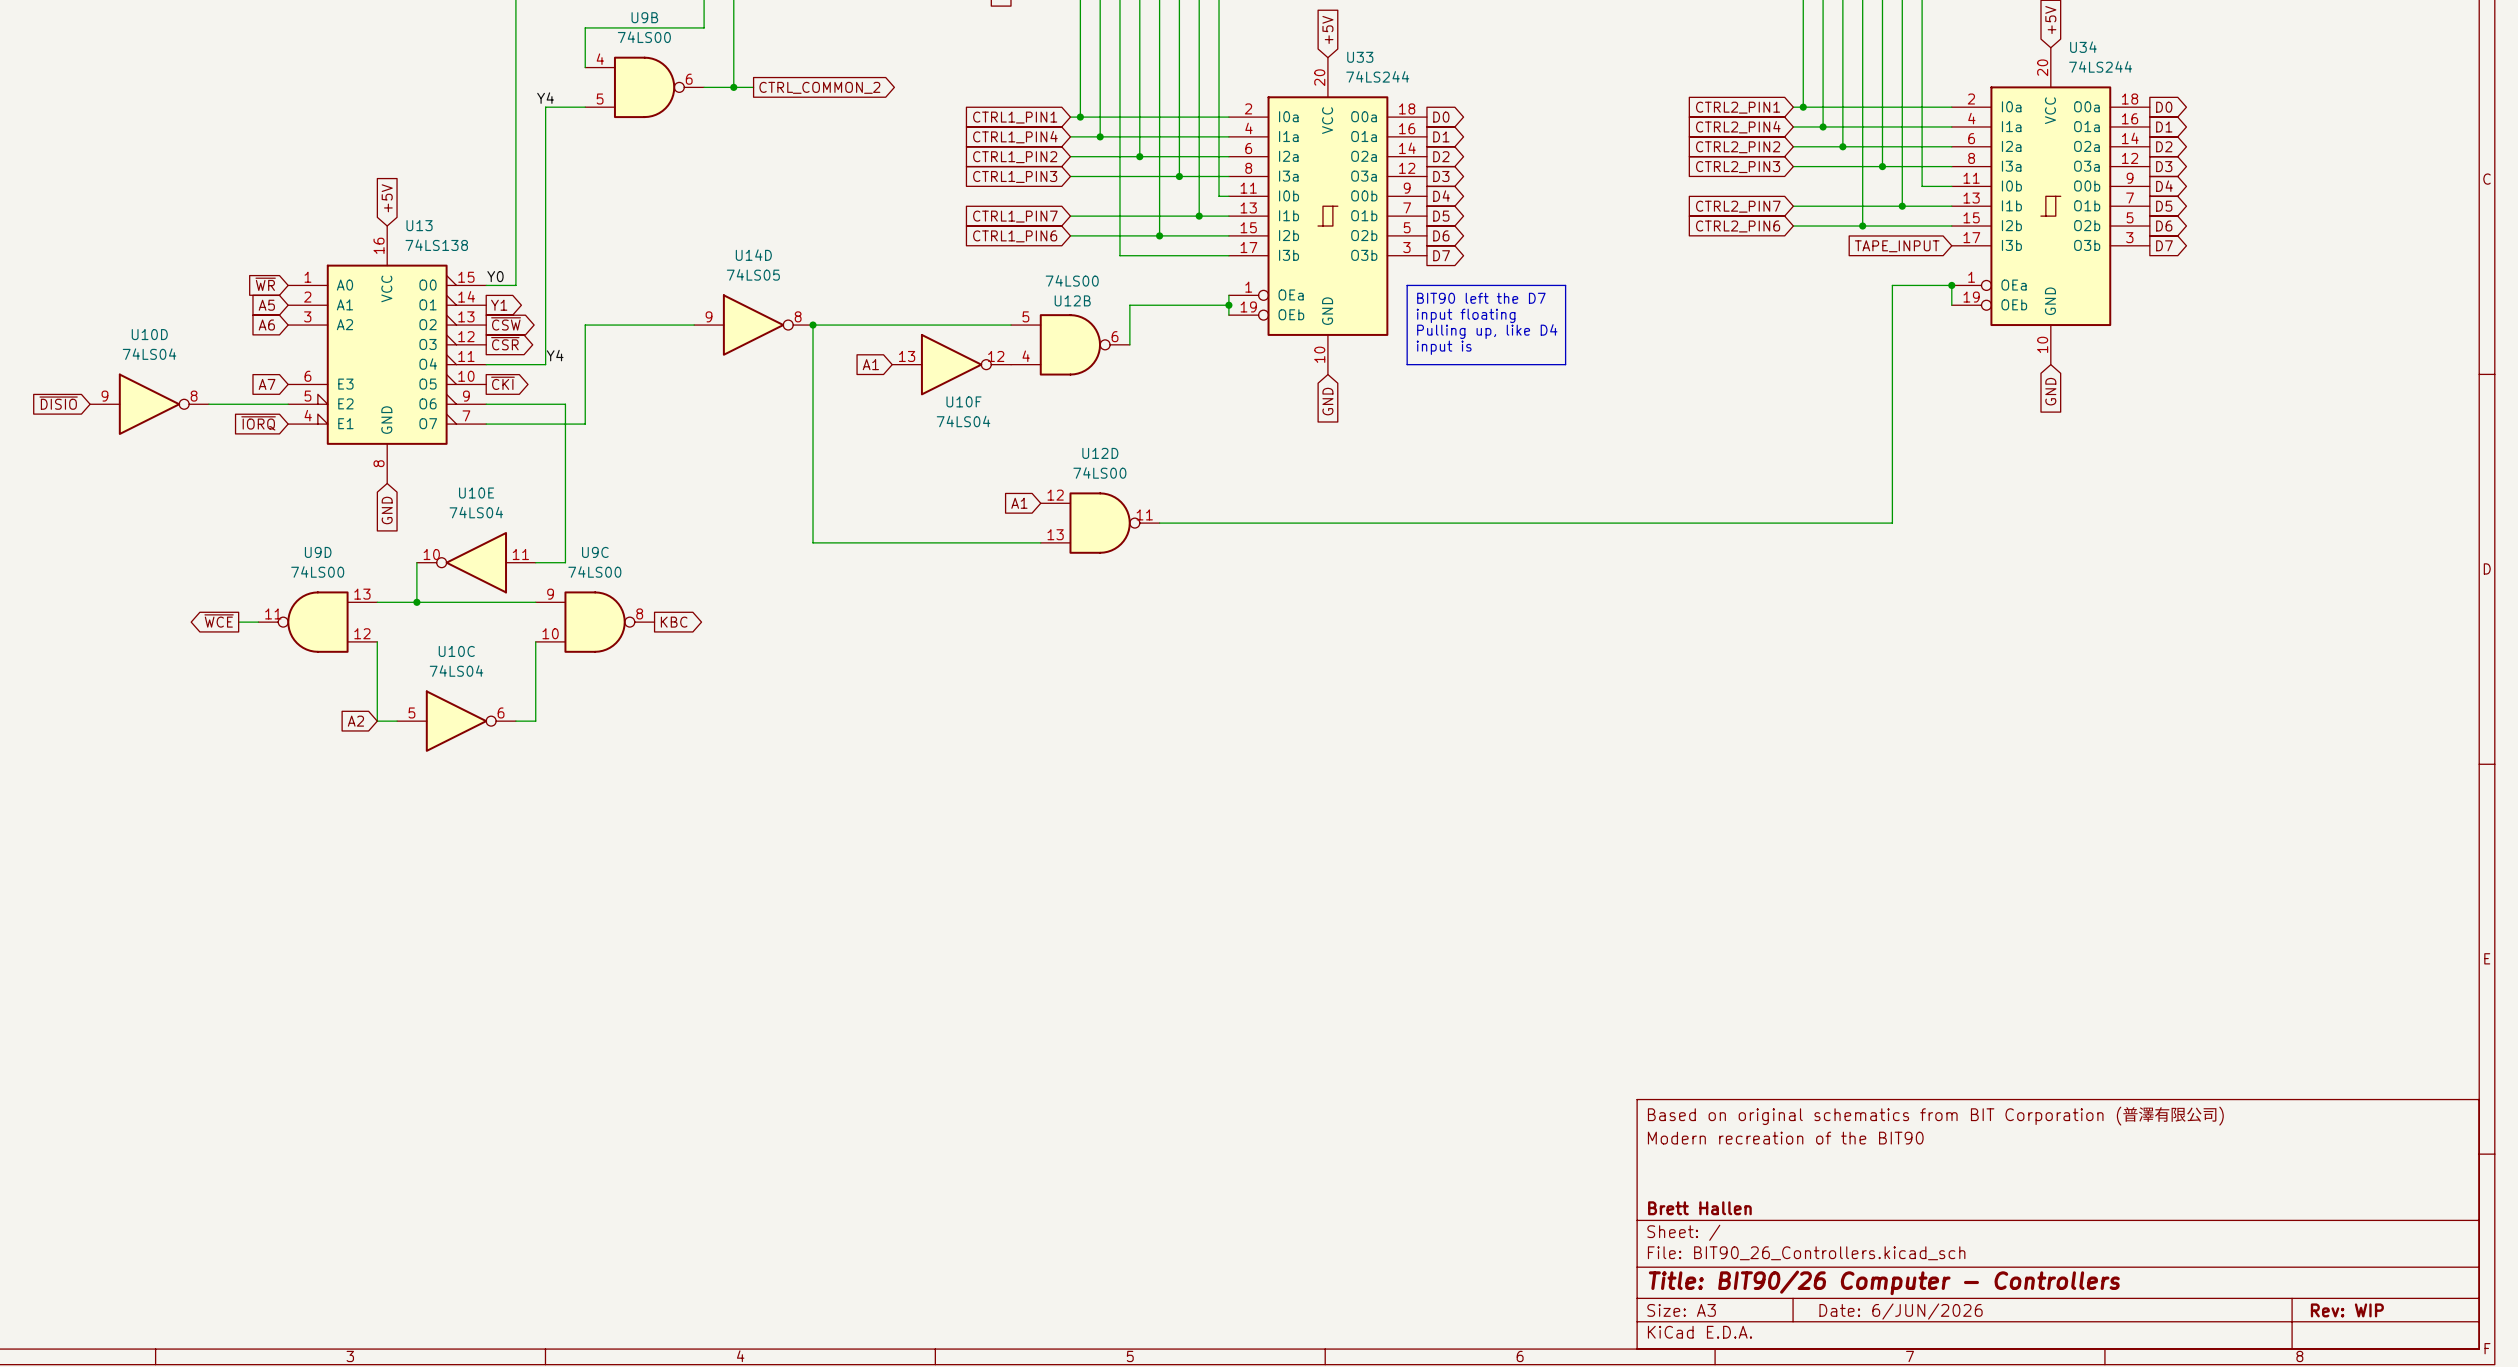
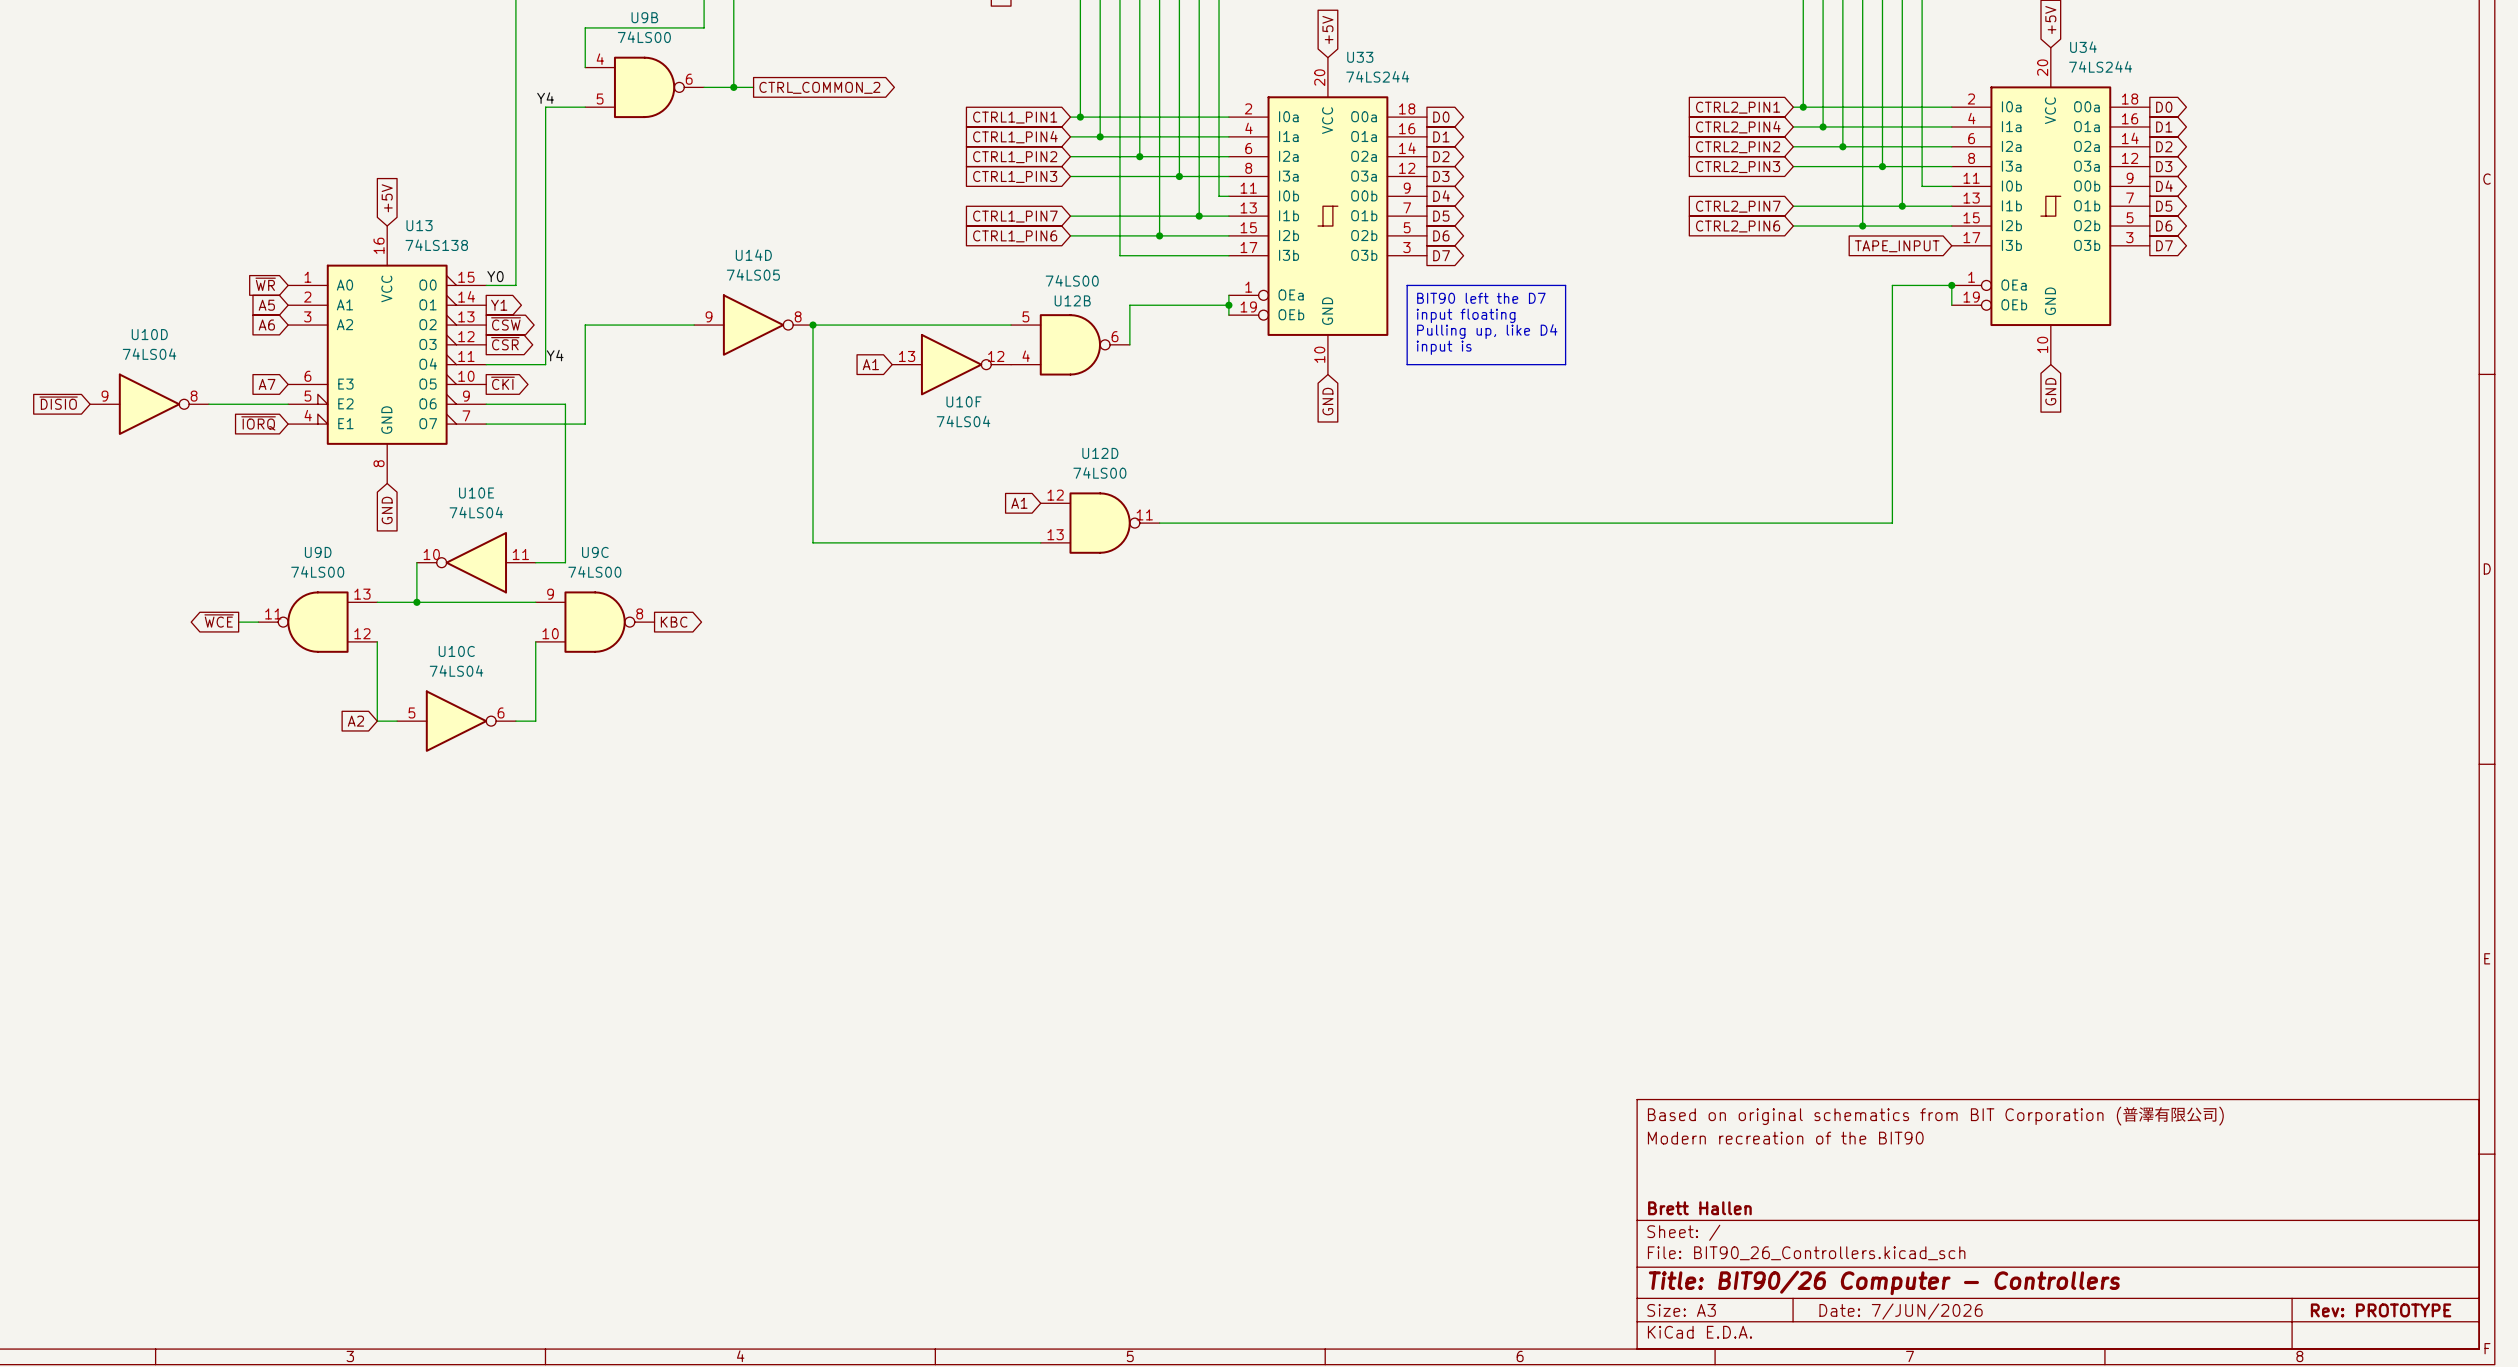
title block: Rev: WIP (2347, 1310) -> Rev: PROTOTYPE (2381, 1310)
title block: Date: 6/JUN/2026 (1901, 1311) -> Date: 7/JUN/2026 (1901, 1311)

